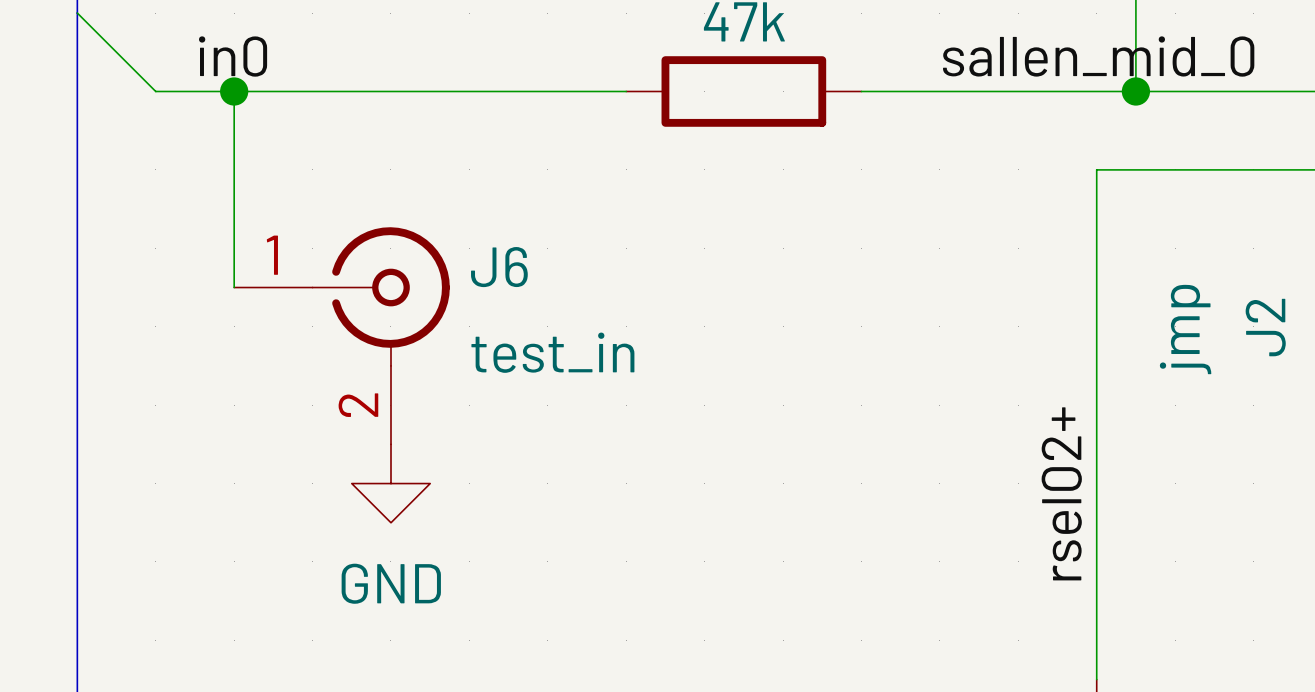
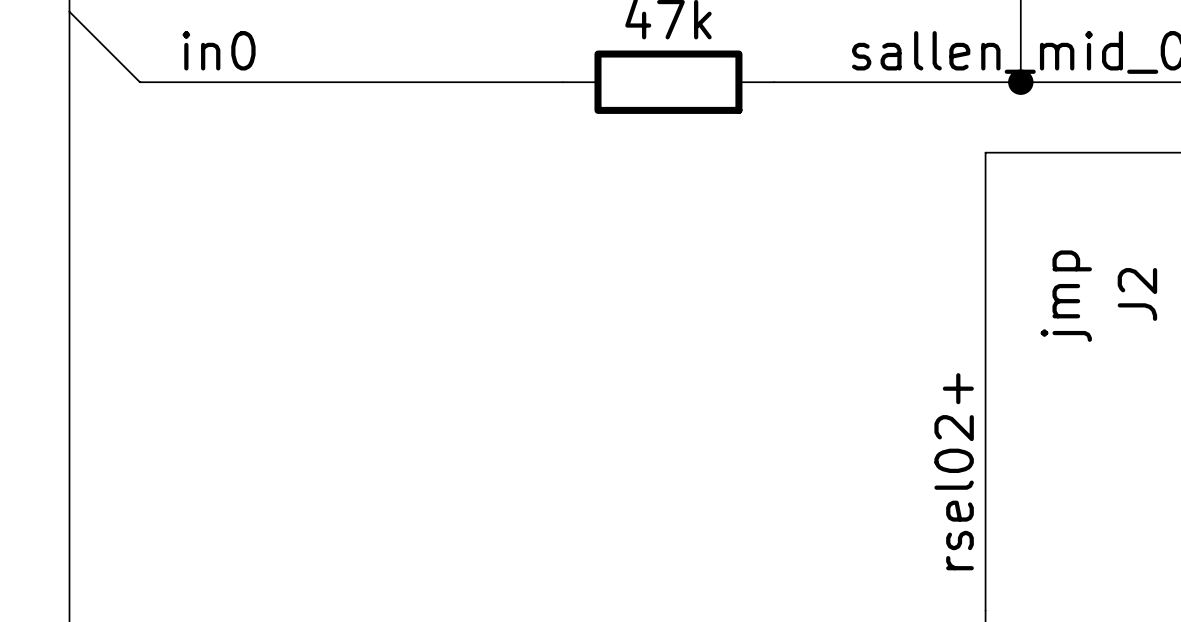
wire: (234, 91) (234, 287) -> none
junction: (234, 91) -> none
J6: test_in (341, 335) -> none
power symbol: GND (390, 483) -> none

